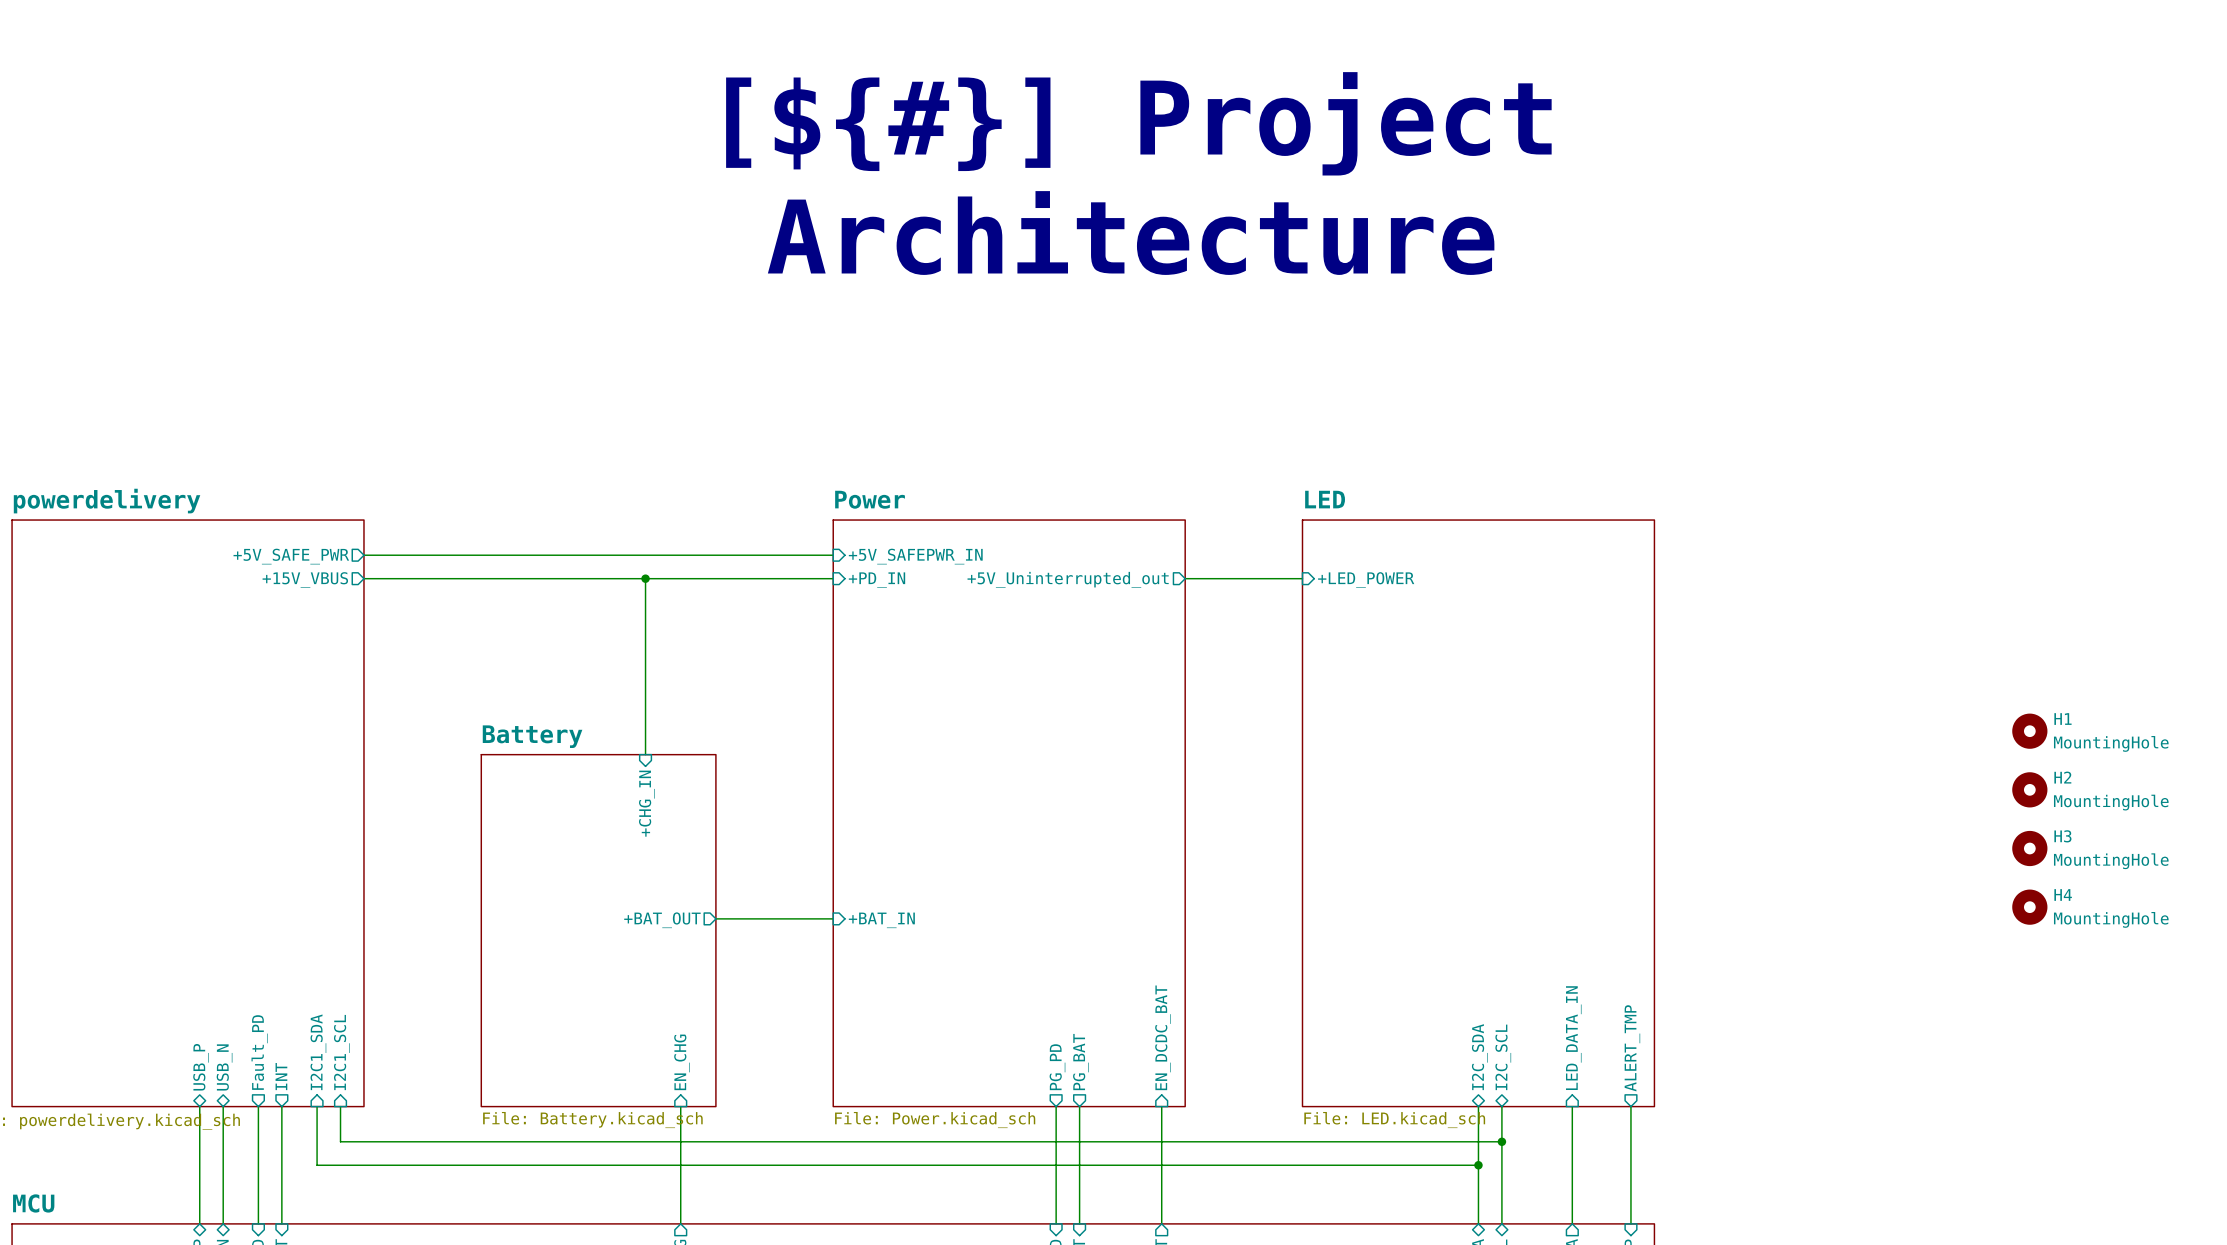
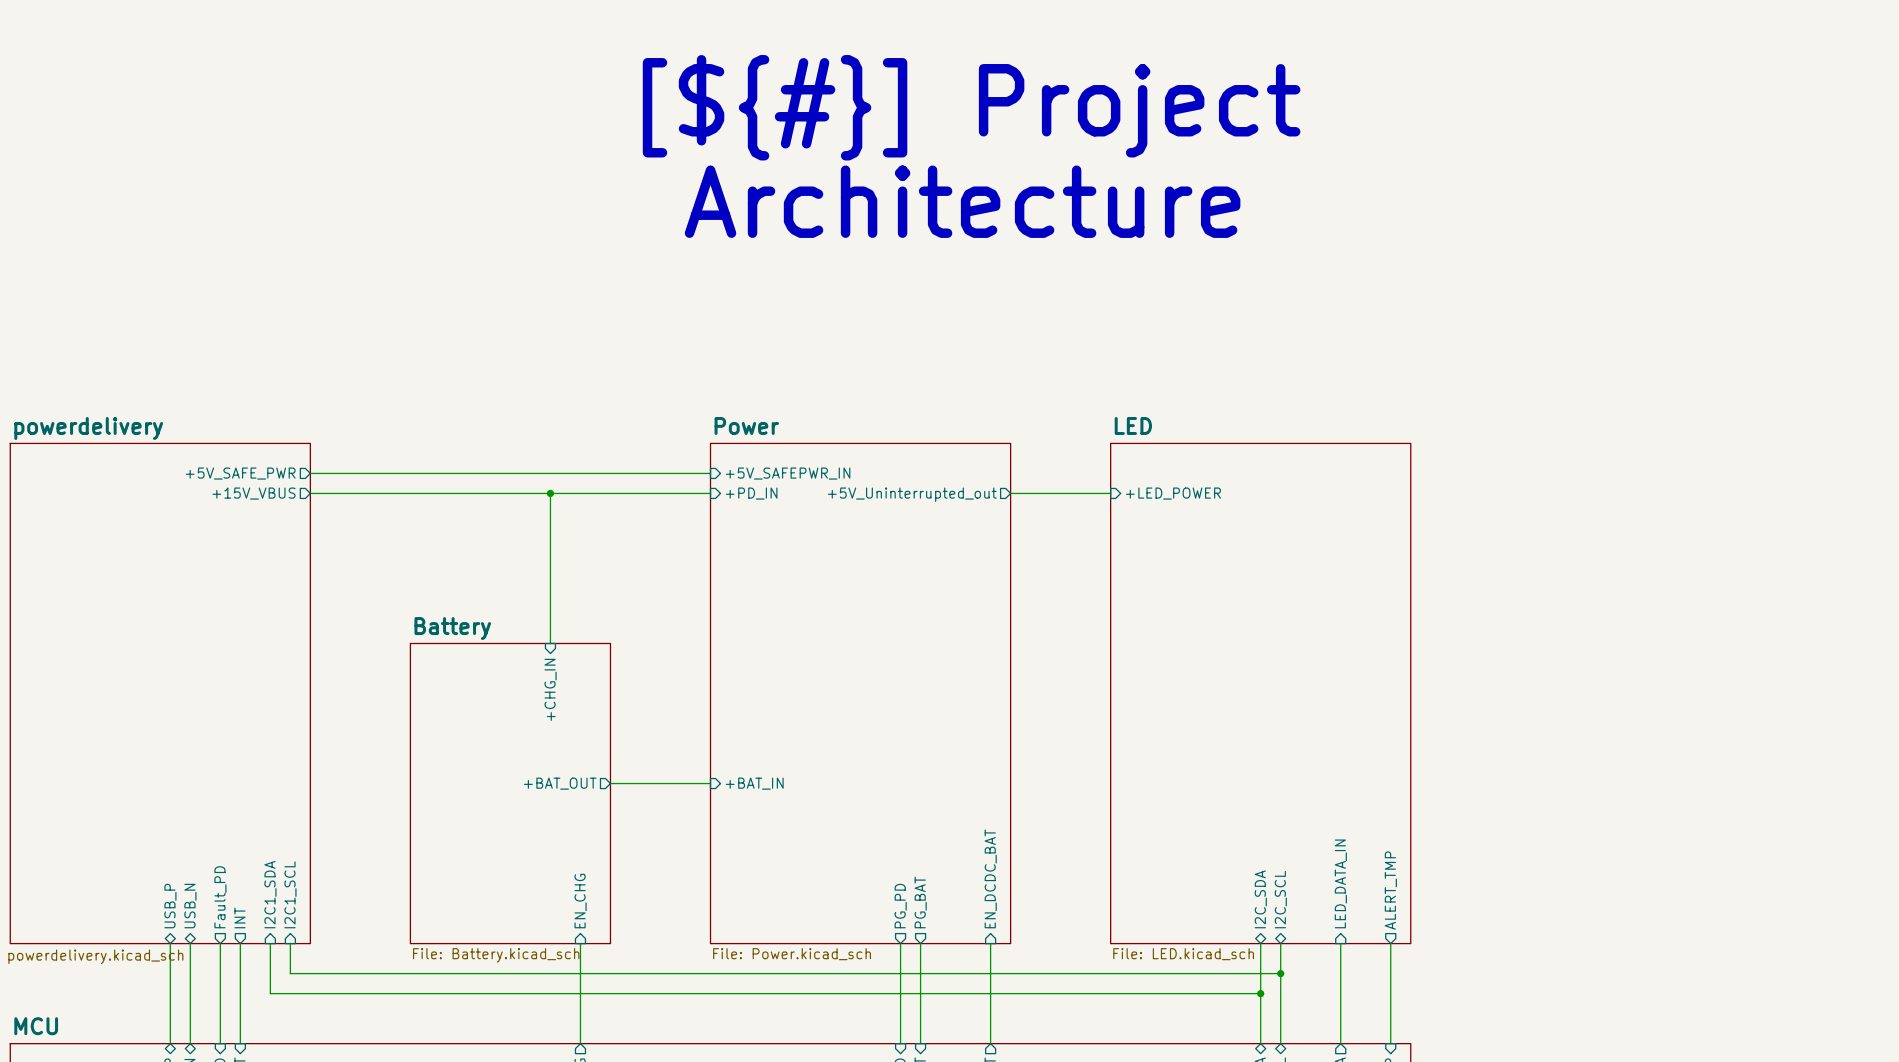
H1: MountingHole (2029, 731) -> none
H2: MountingHole (2029, 789) -> none
H3: MountingHole (2029, 848) -> none
H4: MountingHole (2029, 907) -> none

